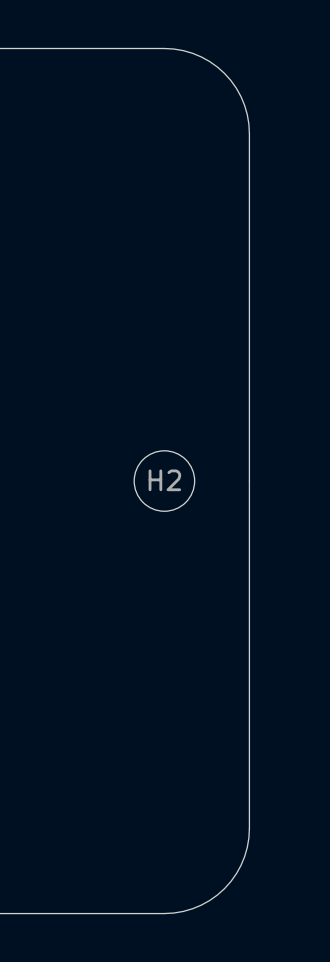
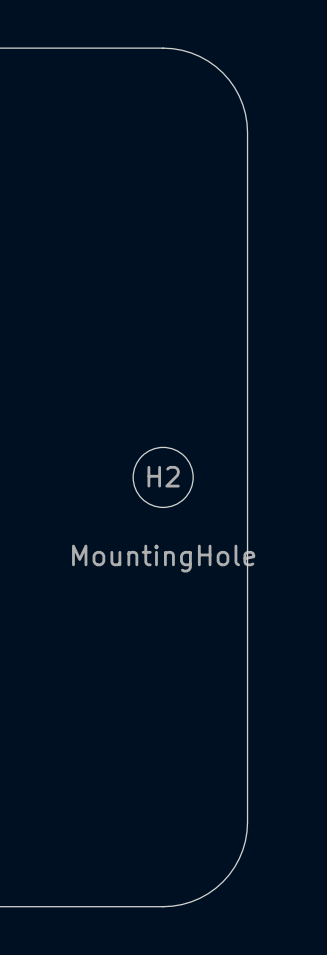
H2 value: none -> MountingHole (163, 558)

